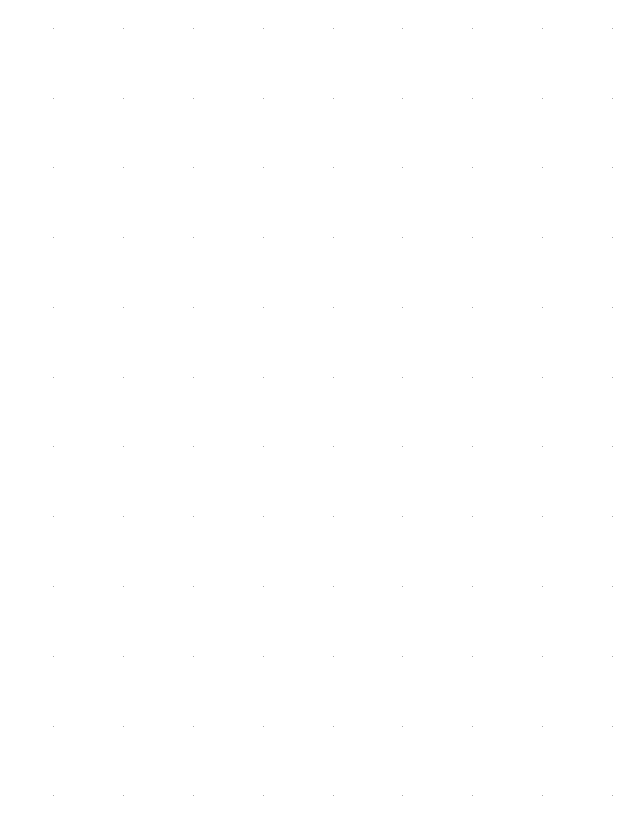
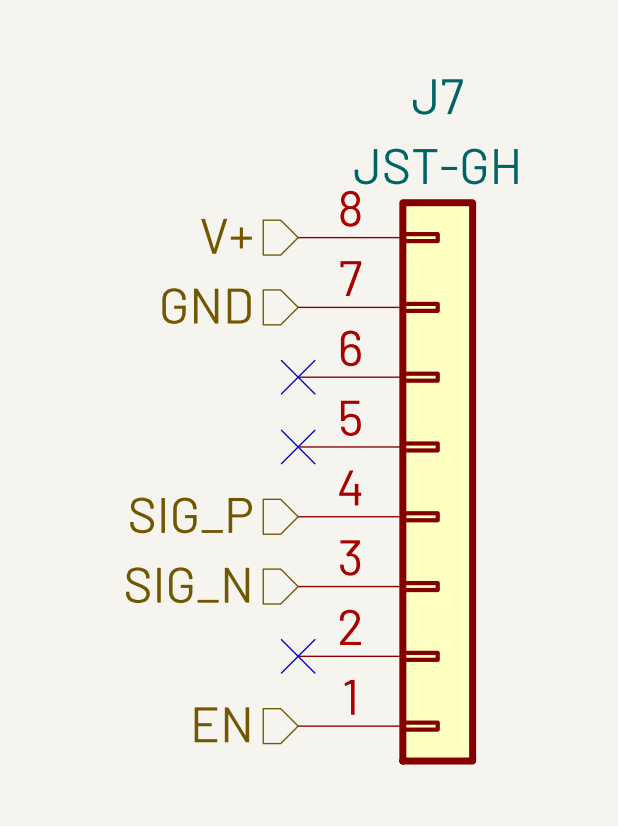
hierarchical label: none -> V+ (226, 236)
hierarchical label: none -> GND (206, 306)
no-connect mark: none -> (298, 377)
no-connect mark: none -> (298, 446)
J7: none -> JST-GH (387, 481)
hierarchical label: none -> SIG_P (191, 515)
hierarchical label: none -> SIG_N (187, 585)
no-connect mark: none -> (298, 656)
hierarchical label: none -> EN (221, 724)

